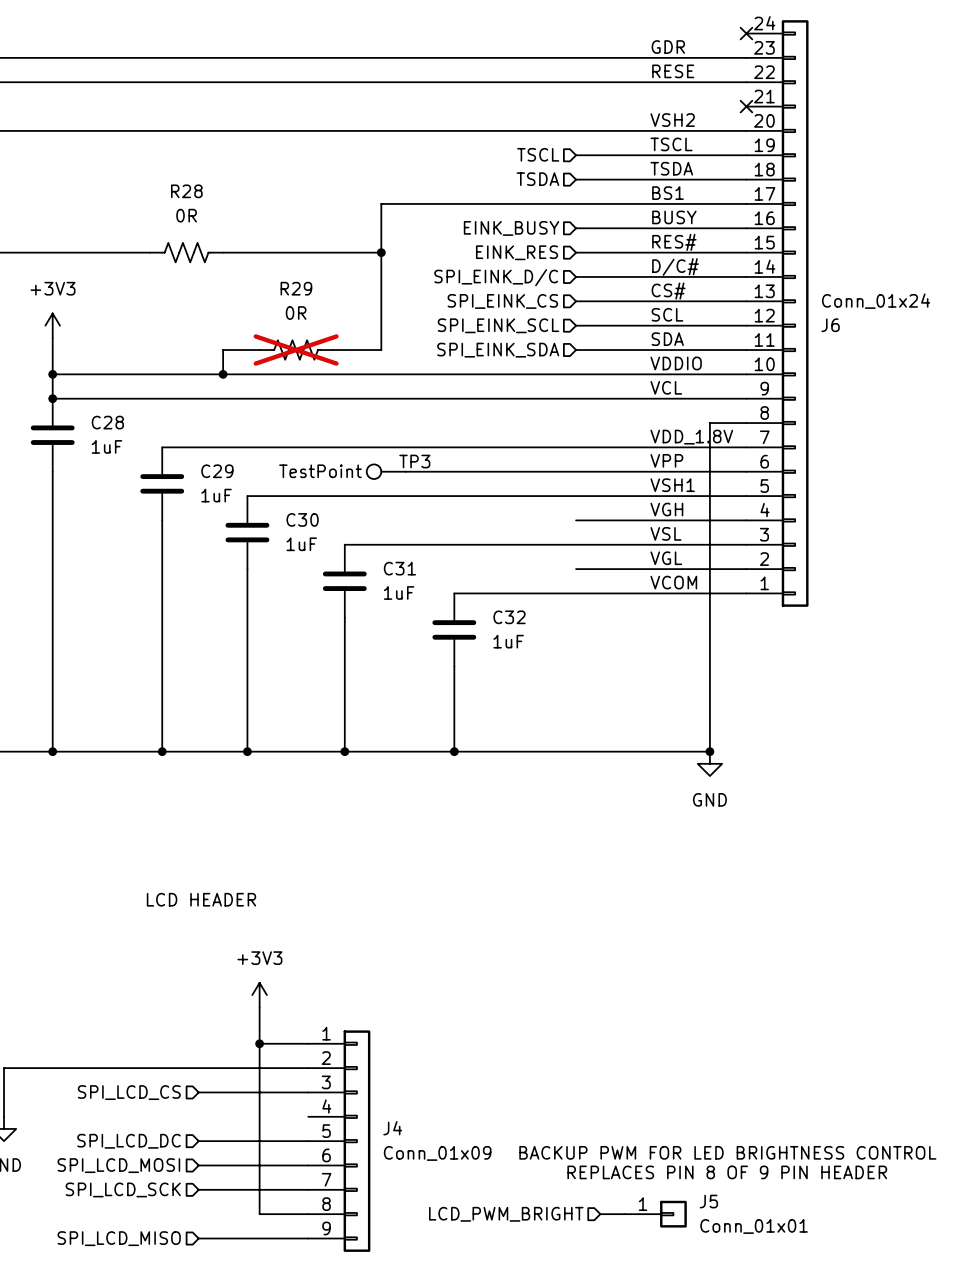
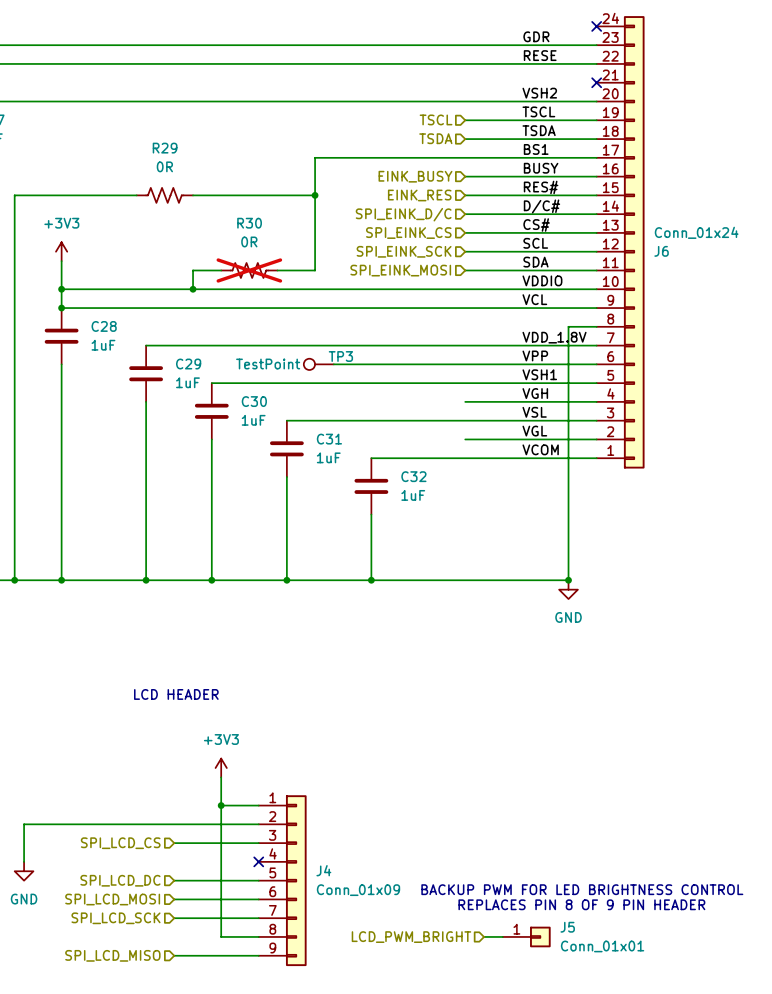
R28 name: R28 (186, 191) -> R29 (165, 148)
R29 name: R29 (296, 288) -> R30 (249, 223)
hierarchical label: SPI_EINK_SCL (498, 325) -> SPI_EINK_SCK (404, 251)
hierarchical label: SPI_EINK_SDA (498, 350) -> SPI_EINK_MOSI (400, 270)
no-connect mark: none -> (258, 861)

